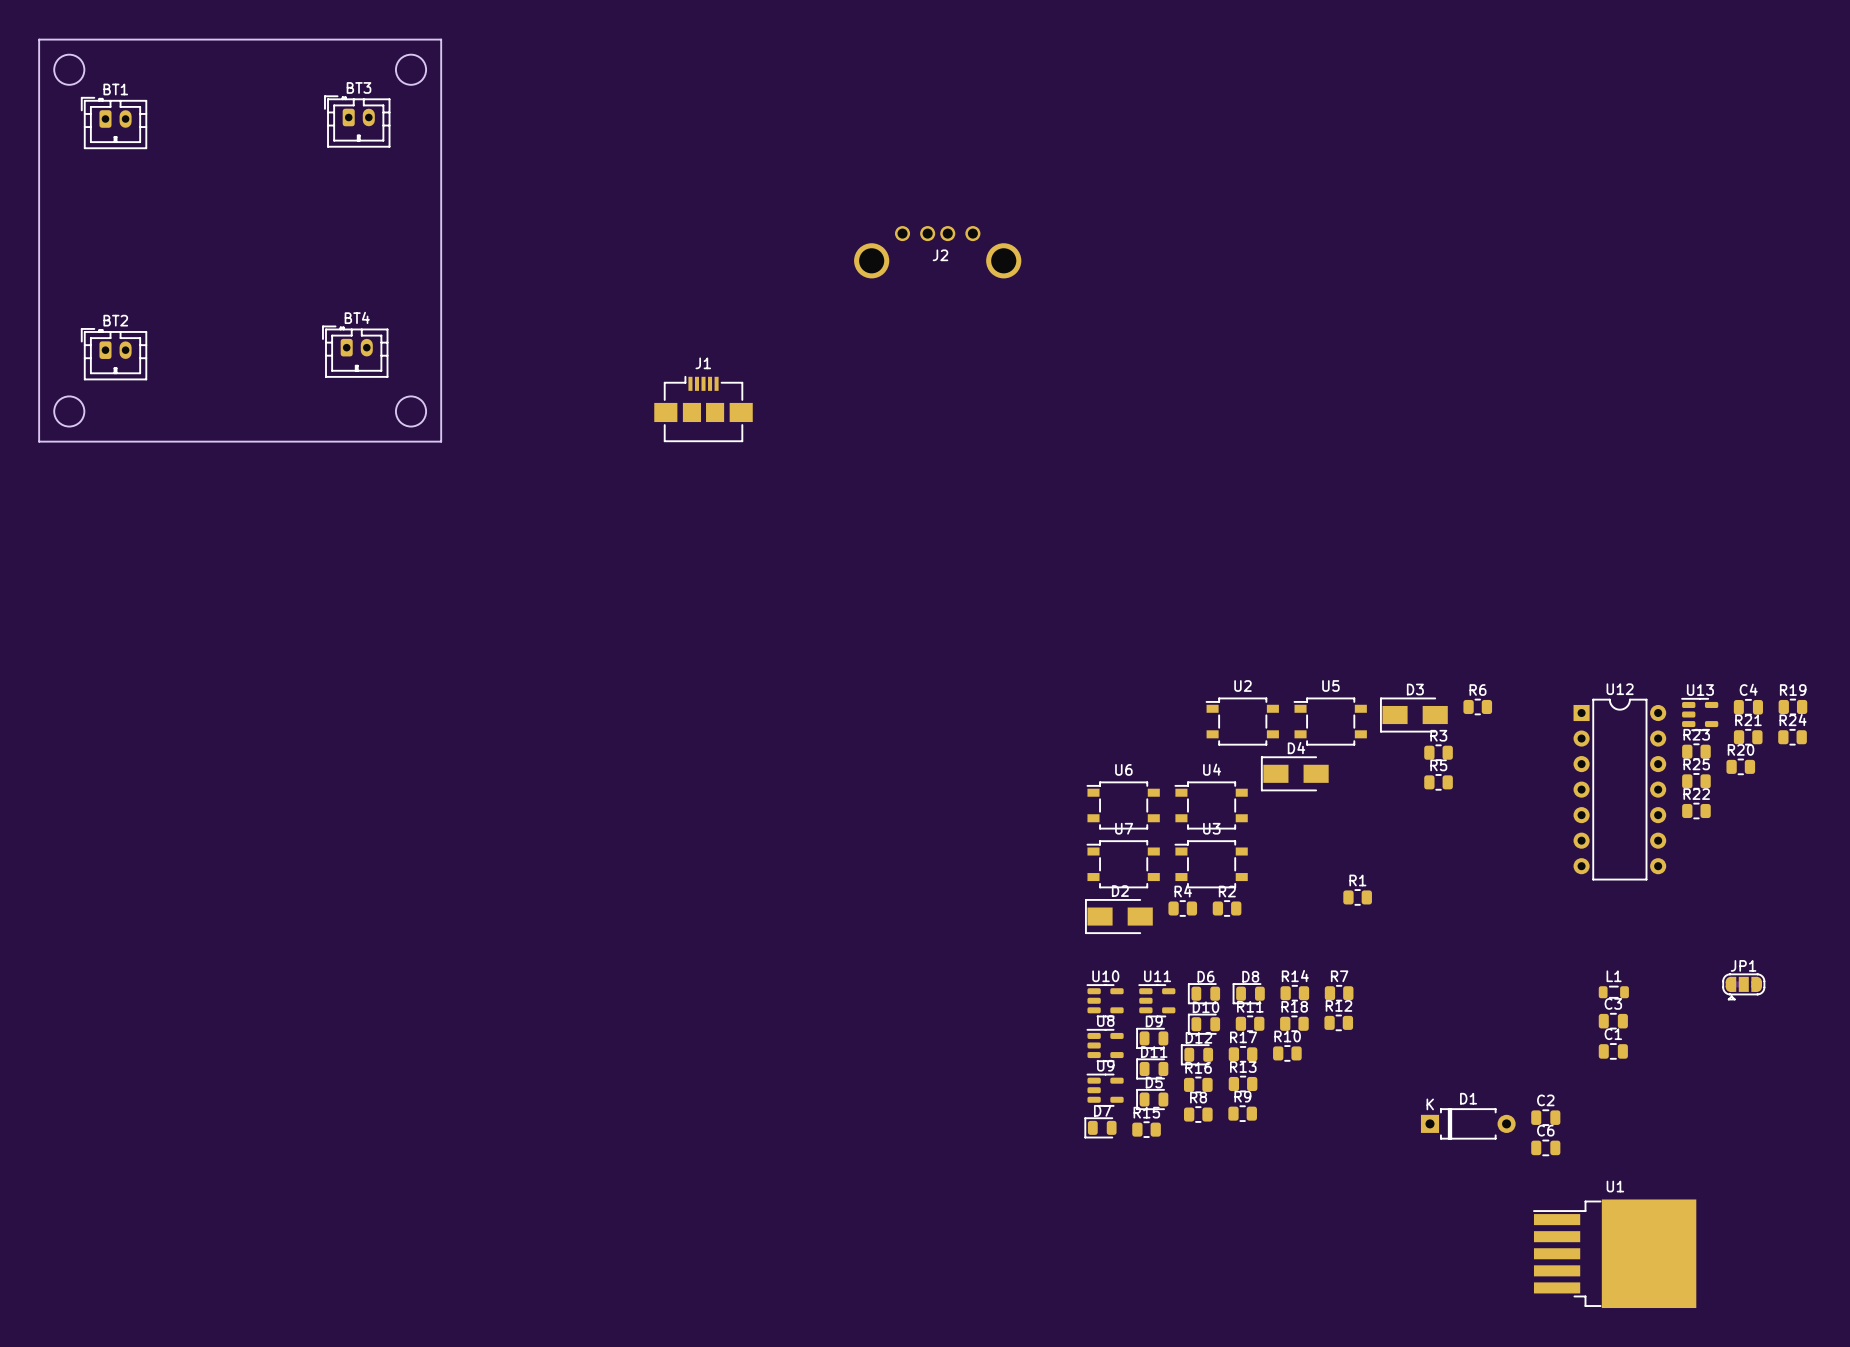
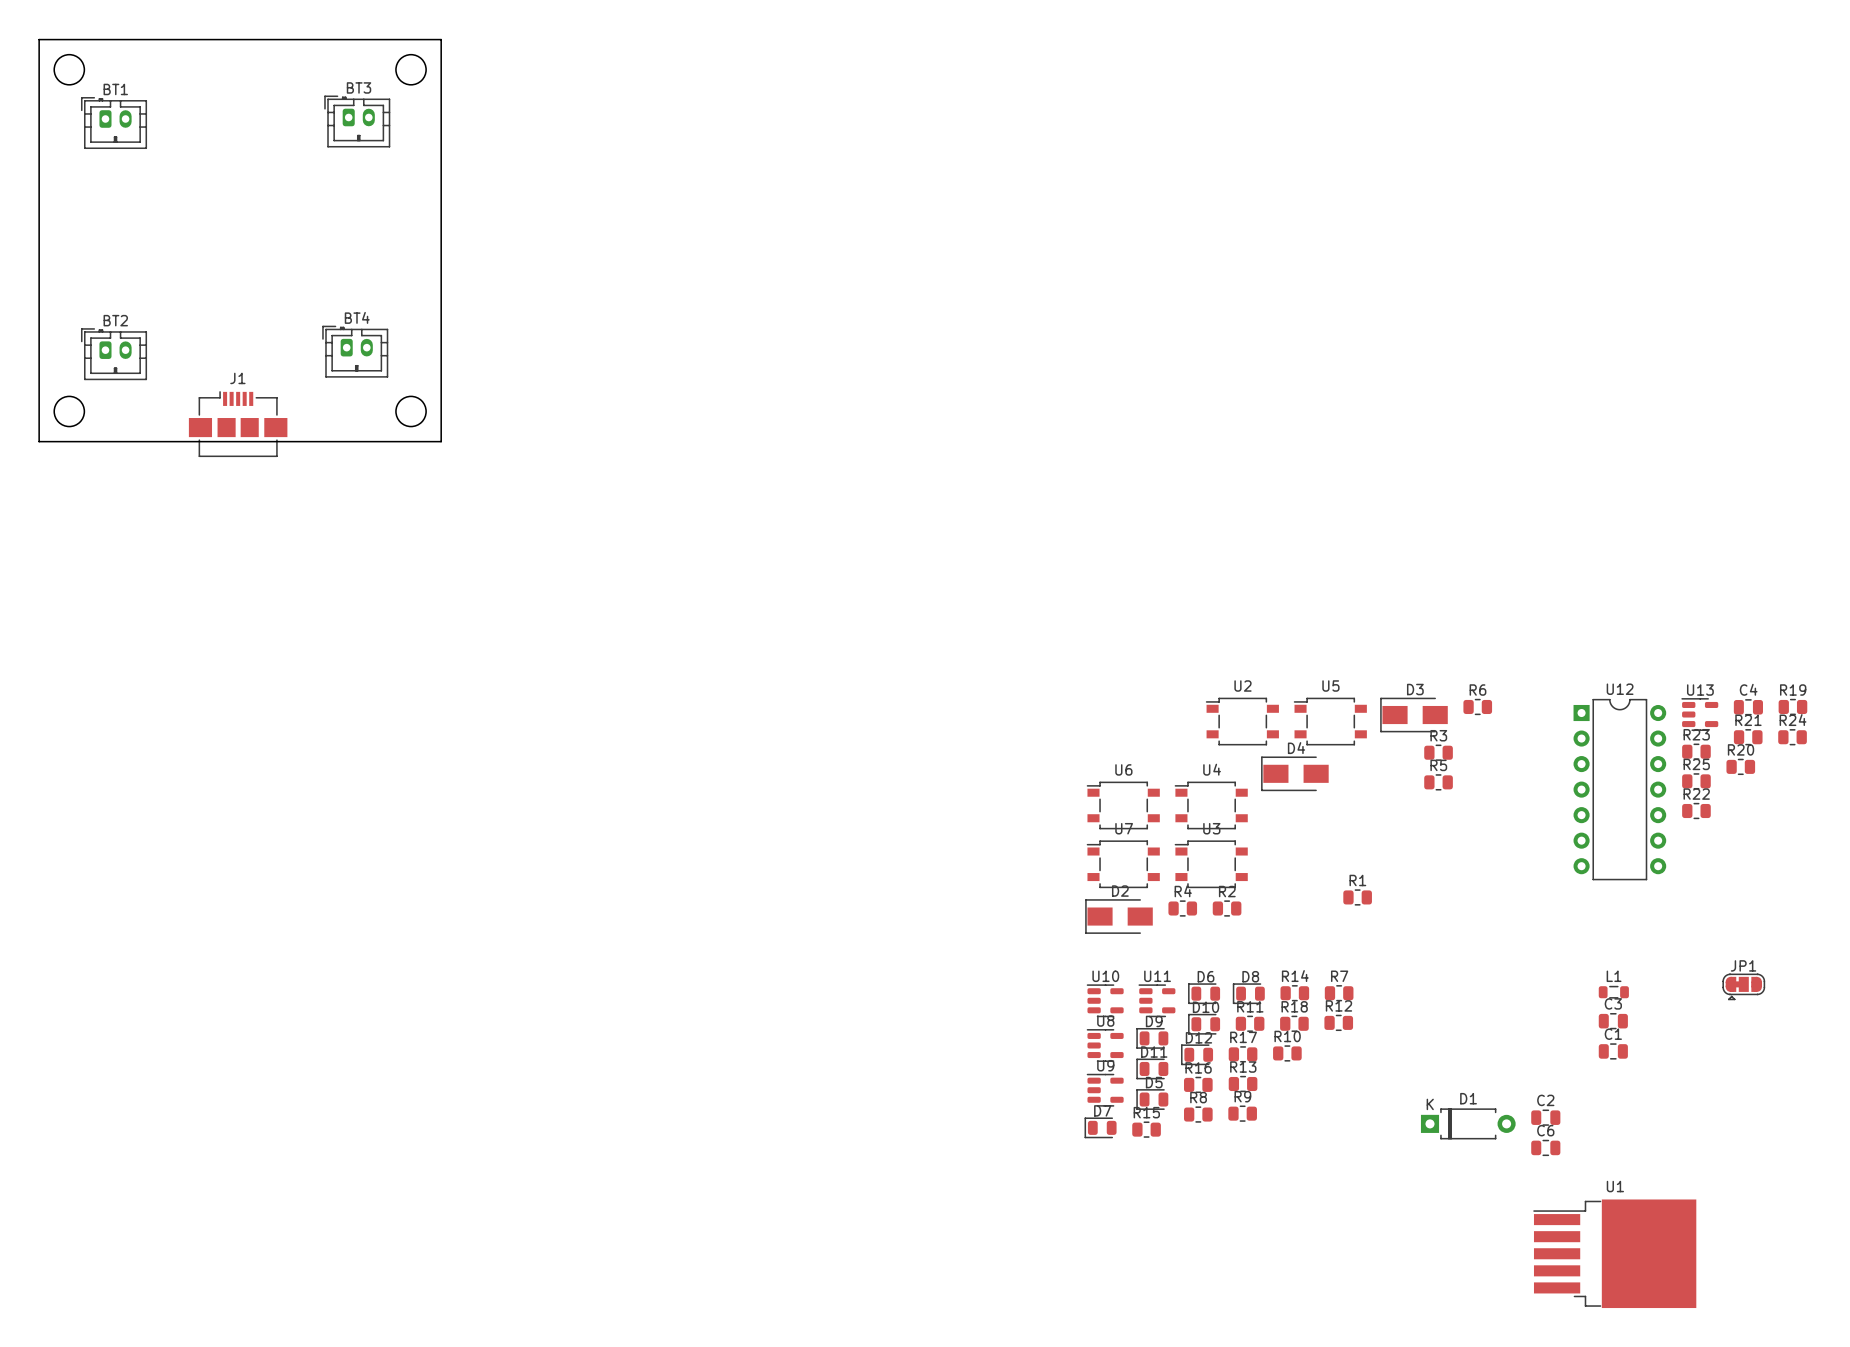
J2: (937, 252) -> none
J1 position: (703, 409) -> (238, 424)

